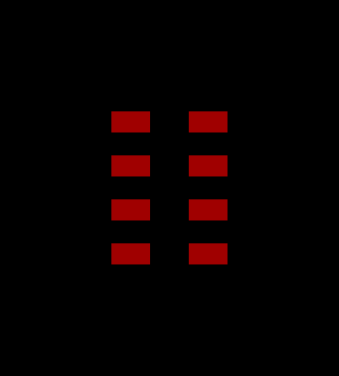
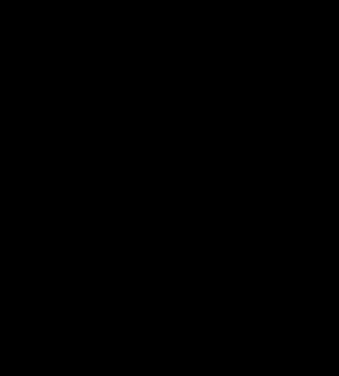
part: (169, 187) -> none

